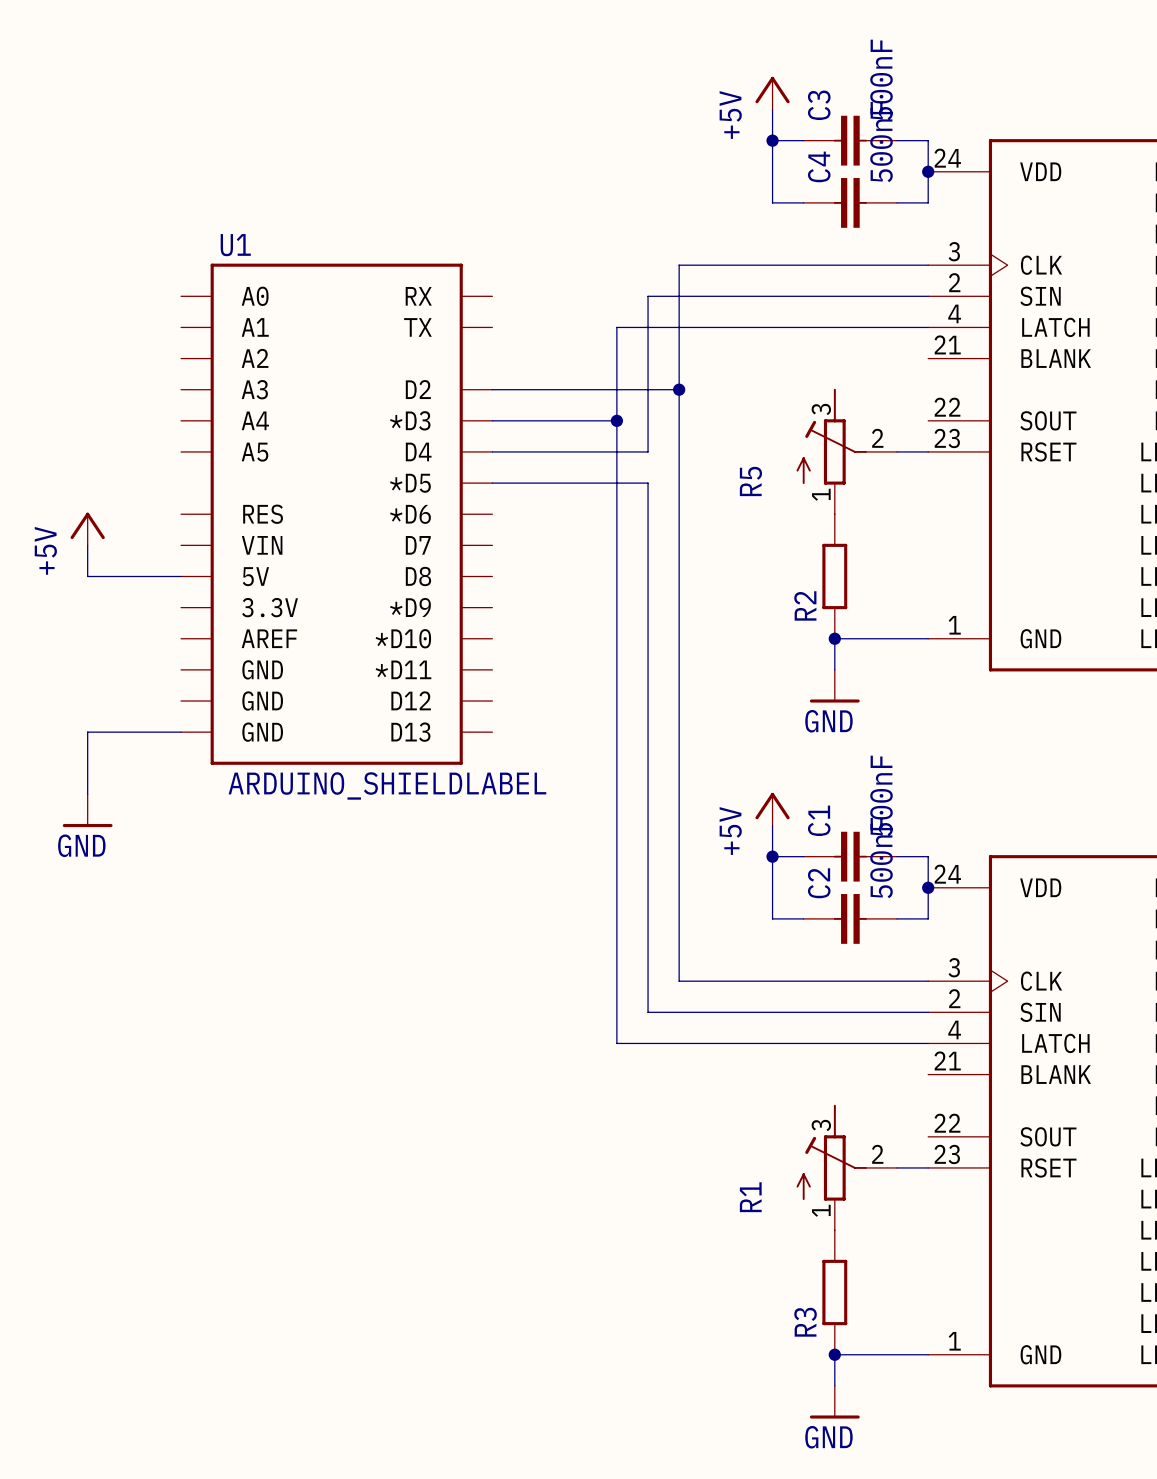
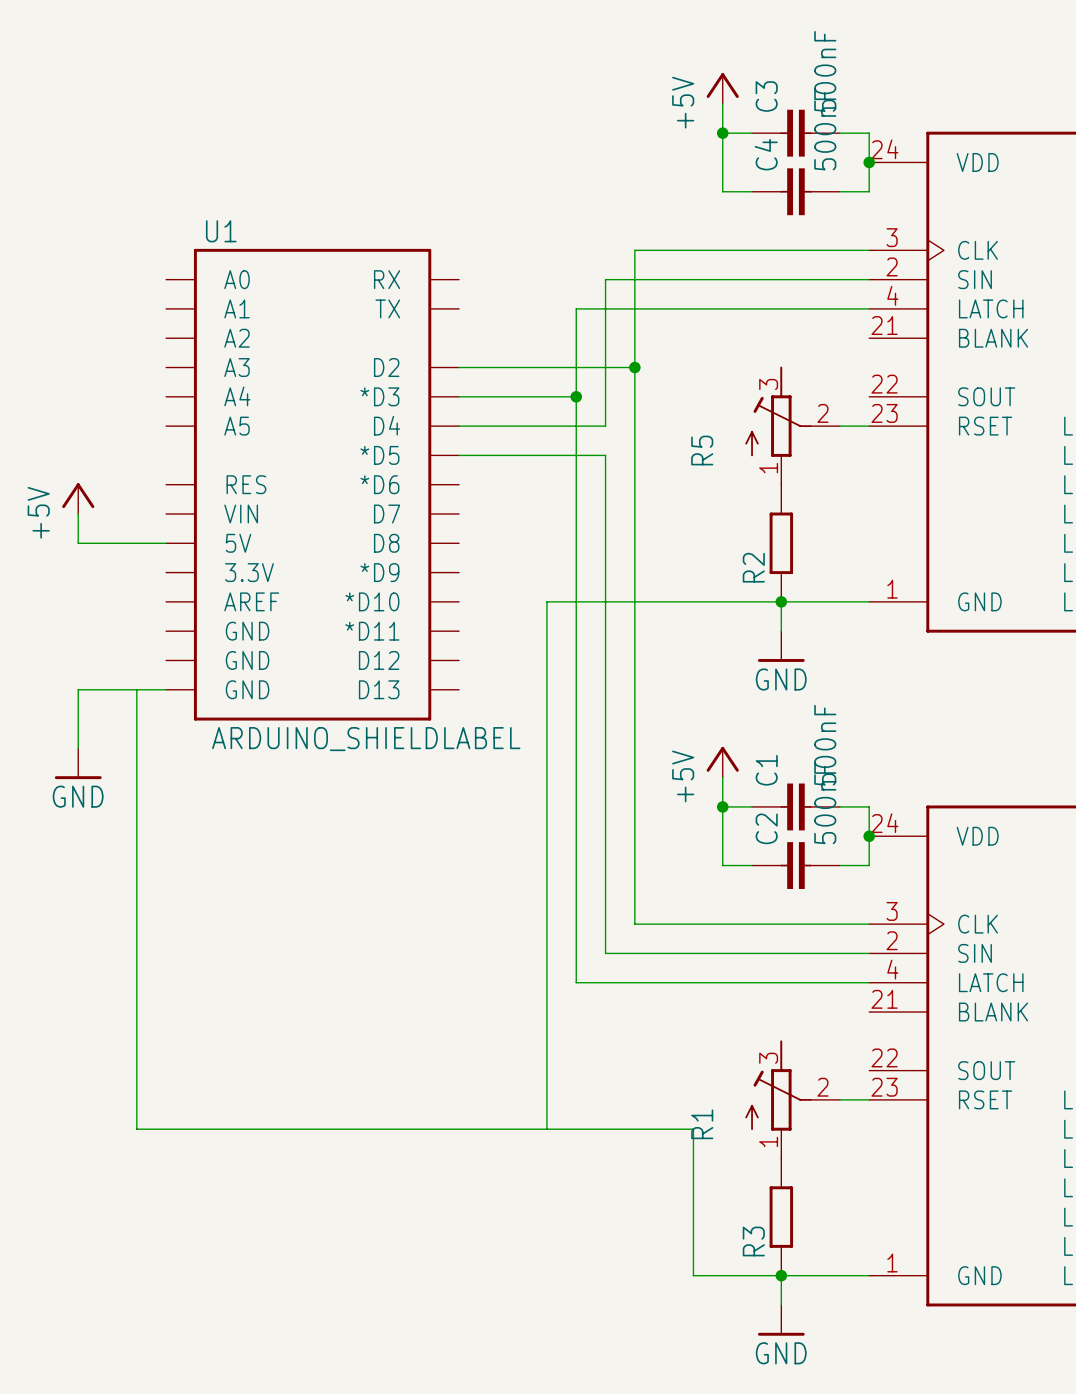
wire: none -> (781, 601) (546, 601) (546, 1129)
wire: none -> (136, 689) (136, 1129) (693, 1129) (693, 1275) (781, 1275)

